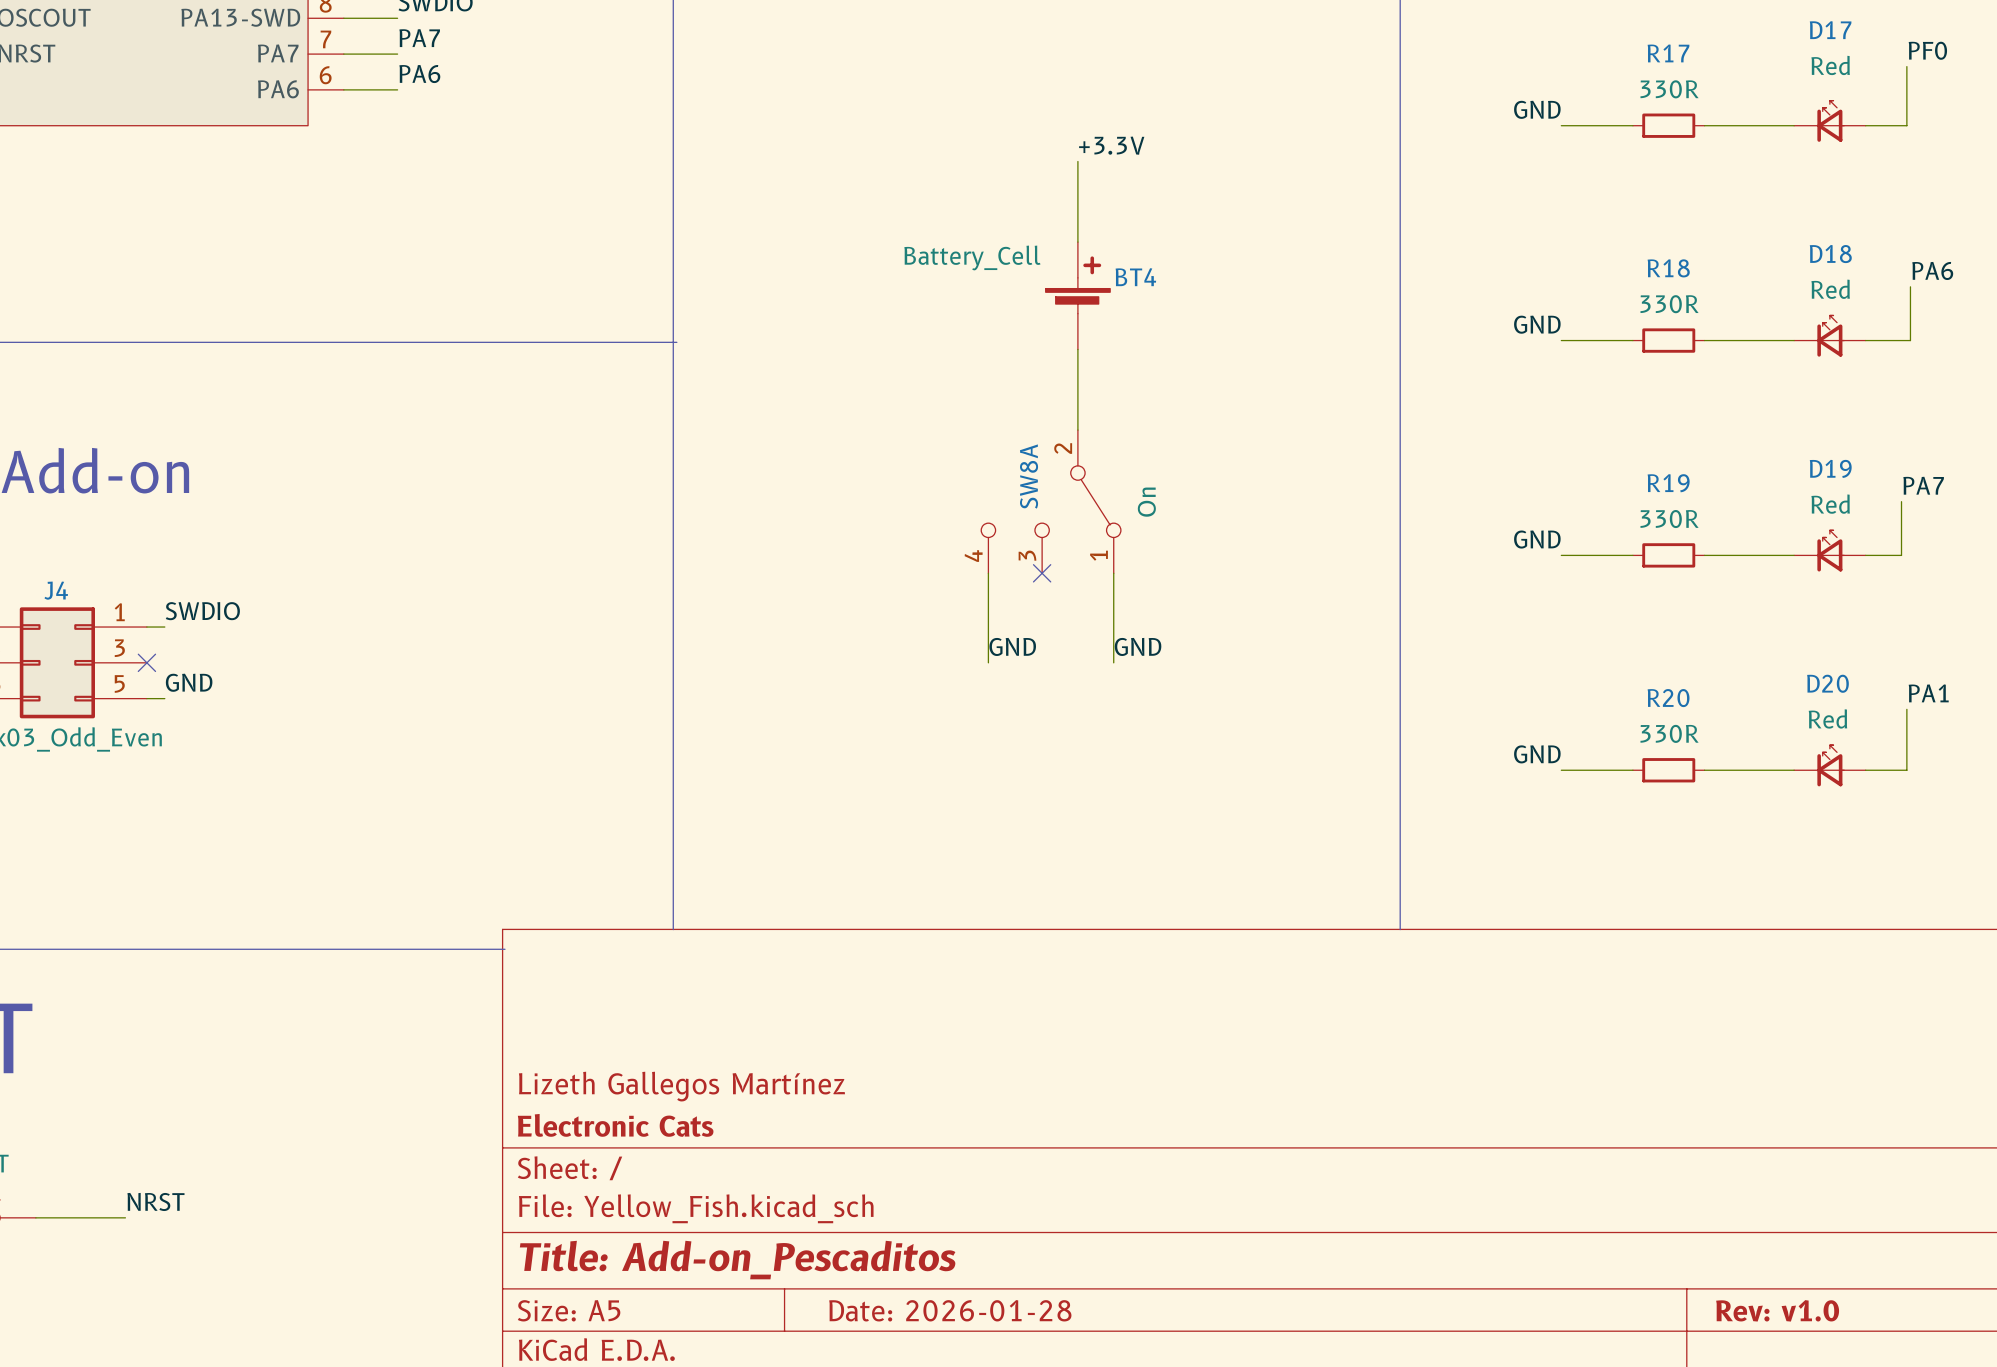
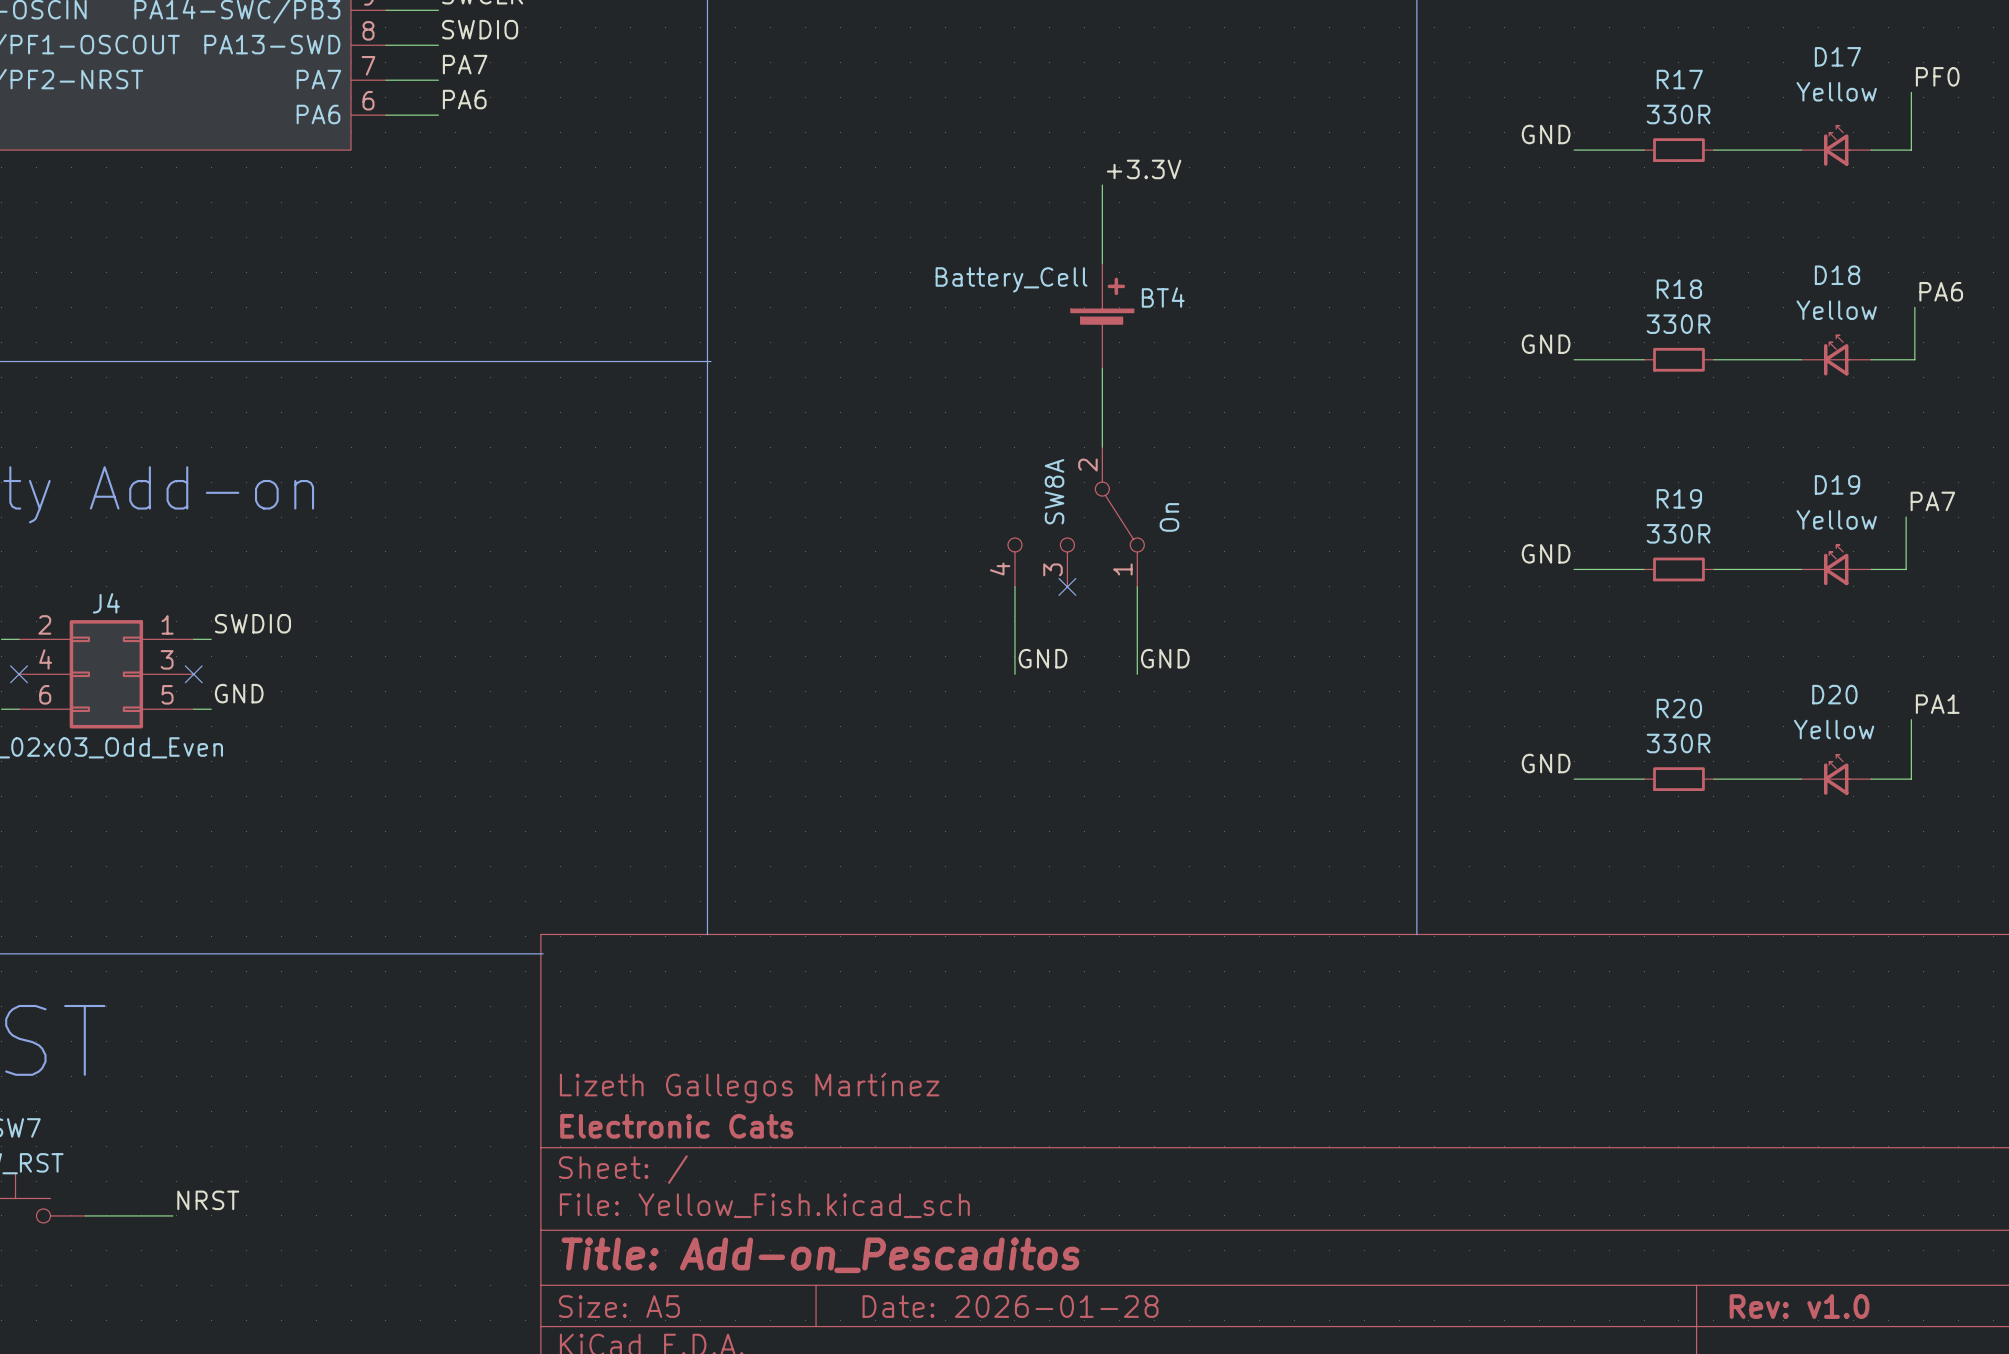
D17 value: Red (1830, 65) -> Yellow (1836, 91)
D18 value: Red (1830, 289) -> Yellow (1836, 310)
D19 value: Red (1830, 504) -> Yellow (1836, 519)
D20 value: Red (1827, 718) -> Yellow (1834, 729)

